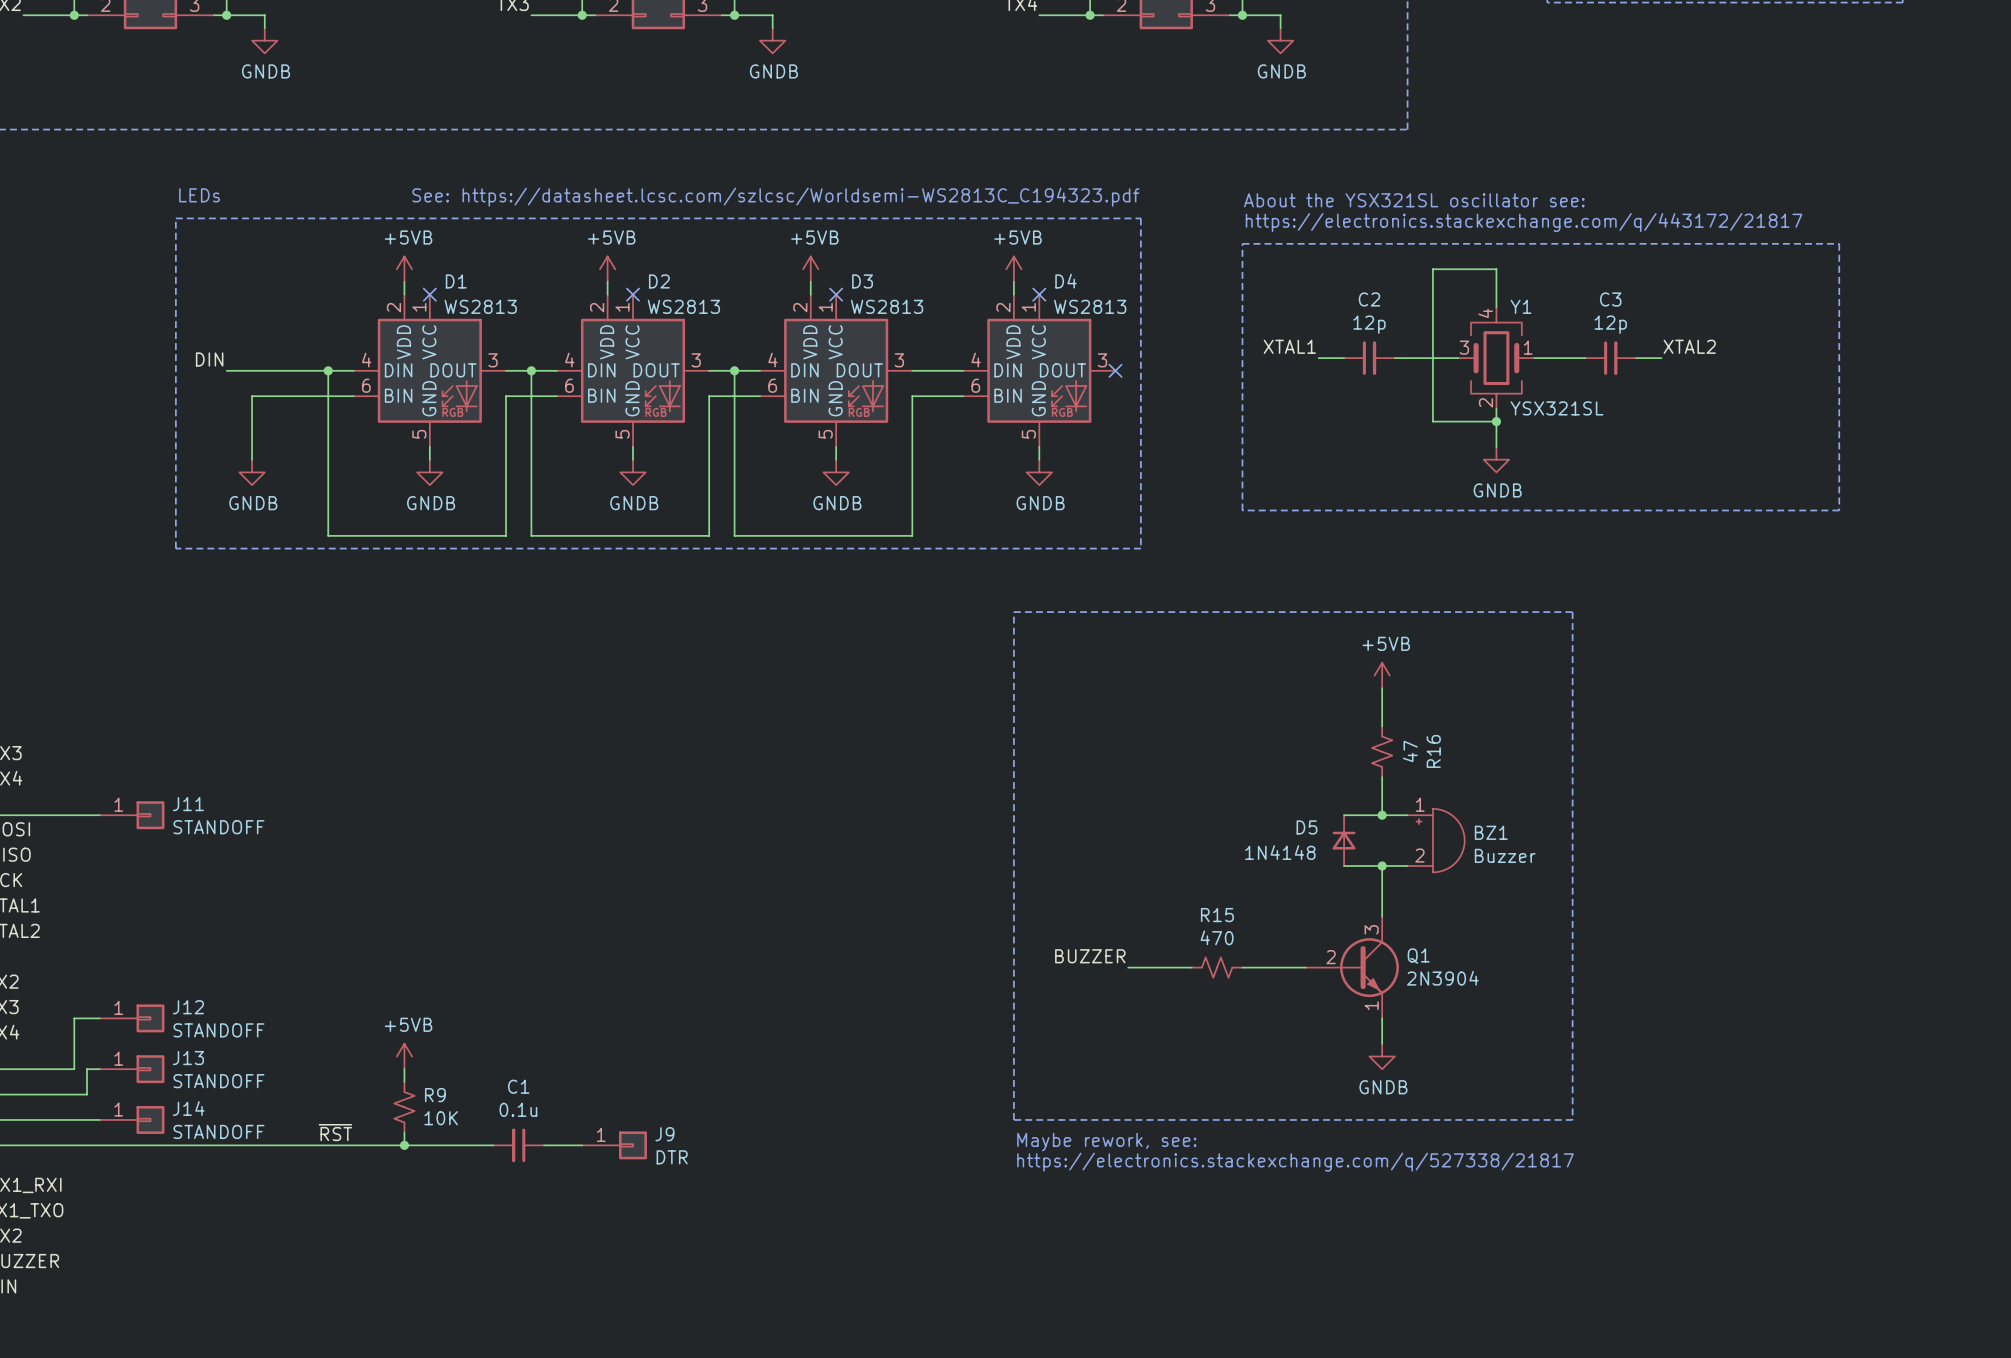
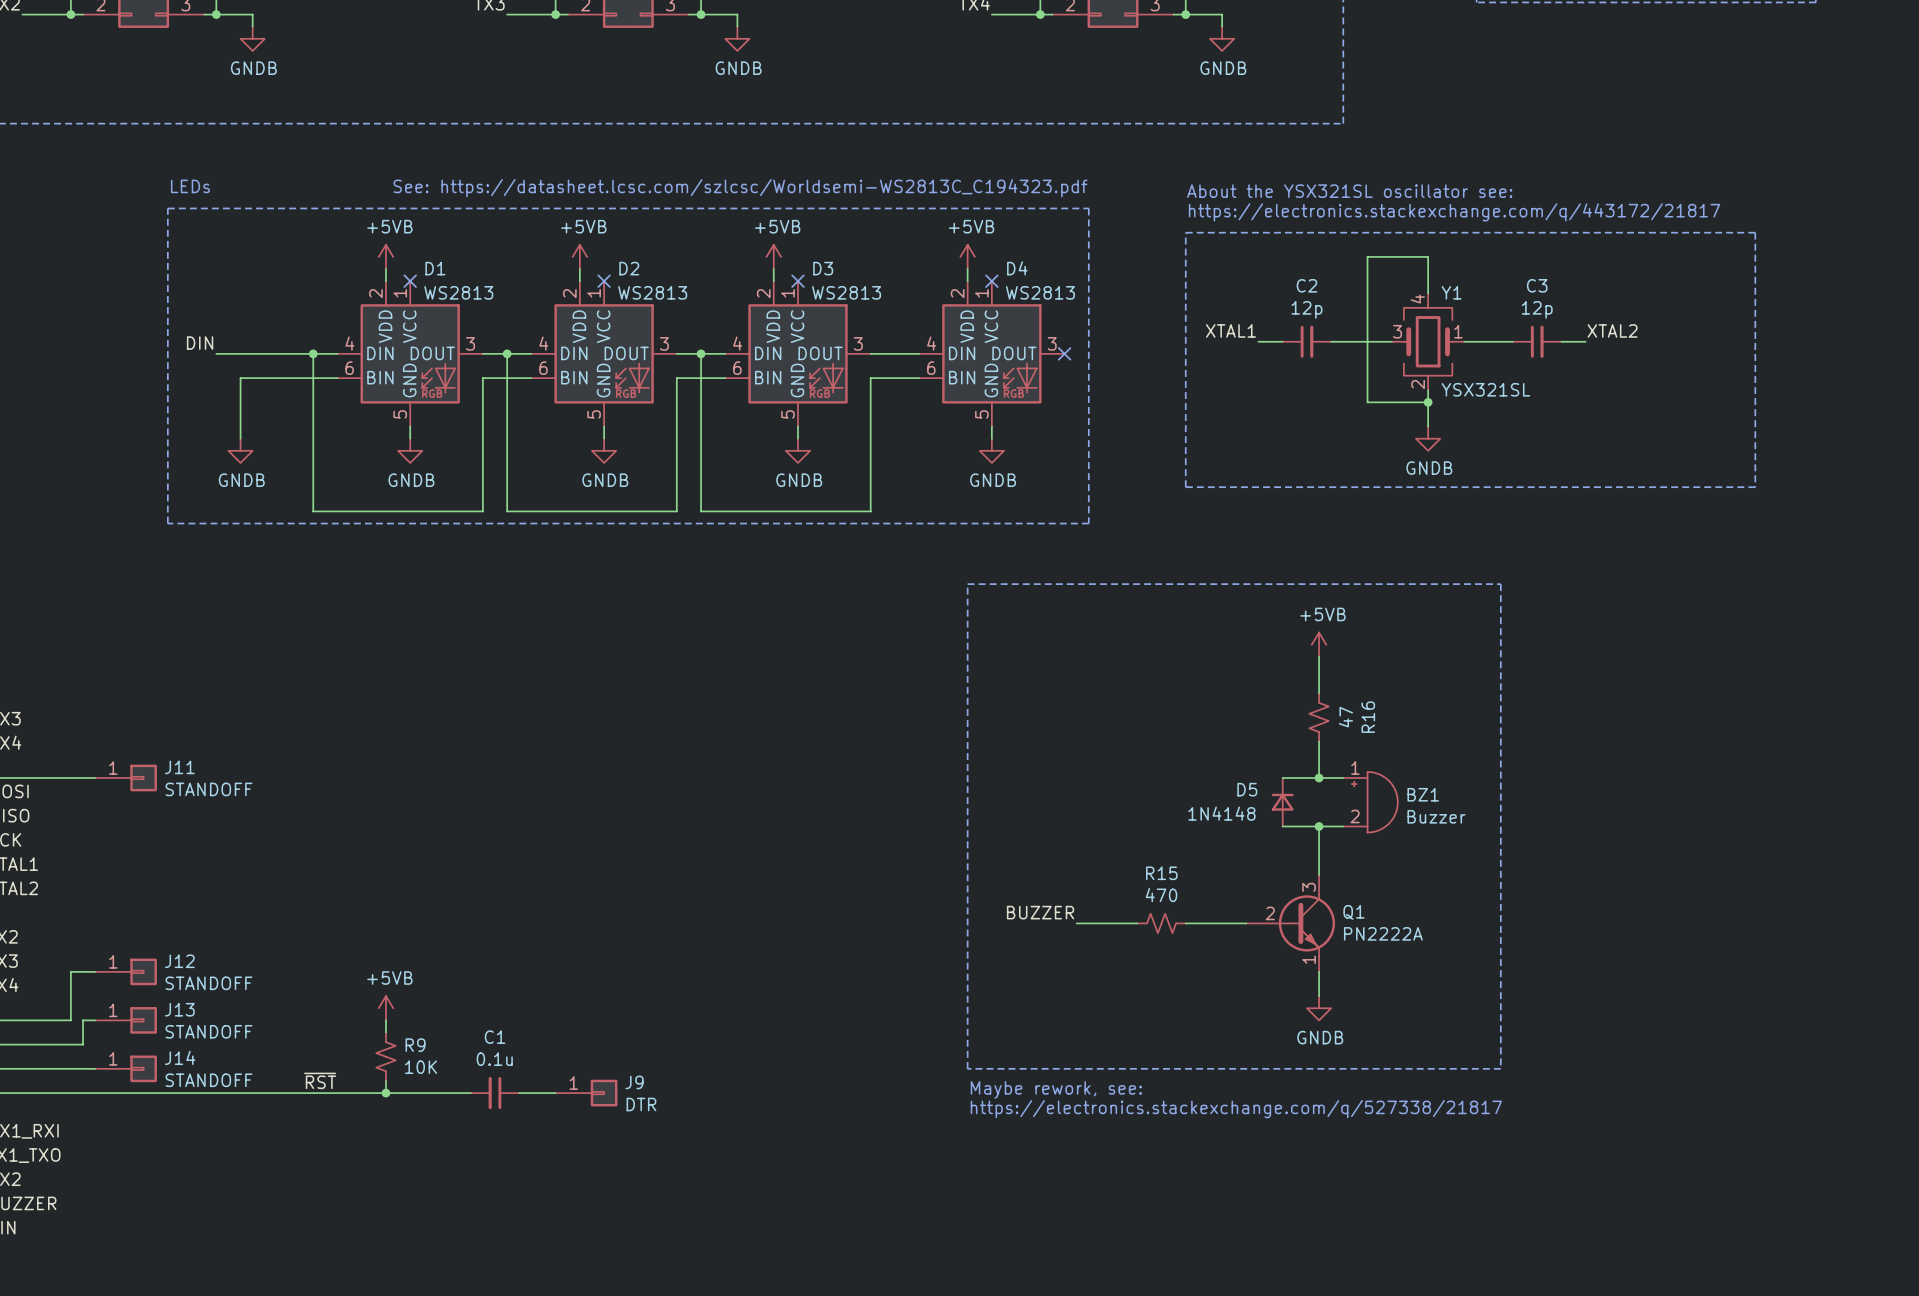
Q1 value: 2N3904 (1442, 978) -> PN2222A (1383, 933)

